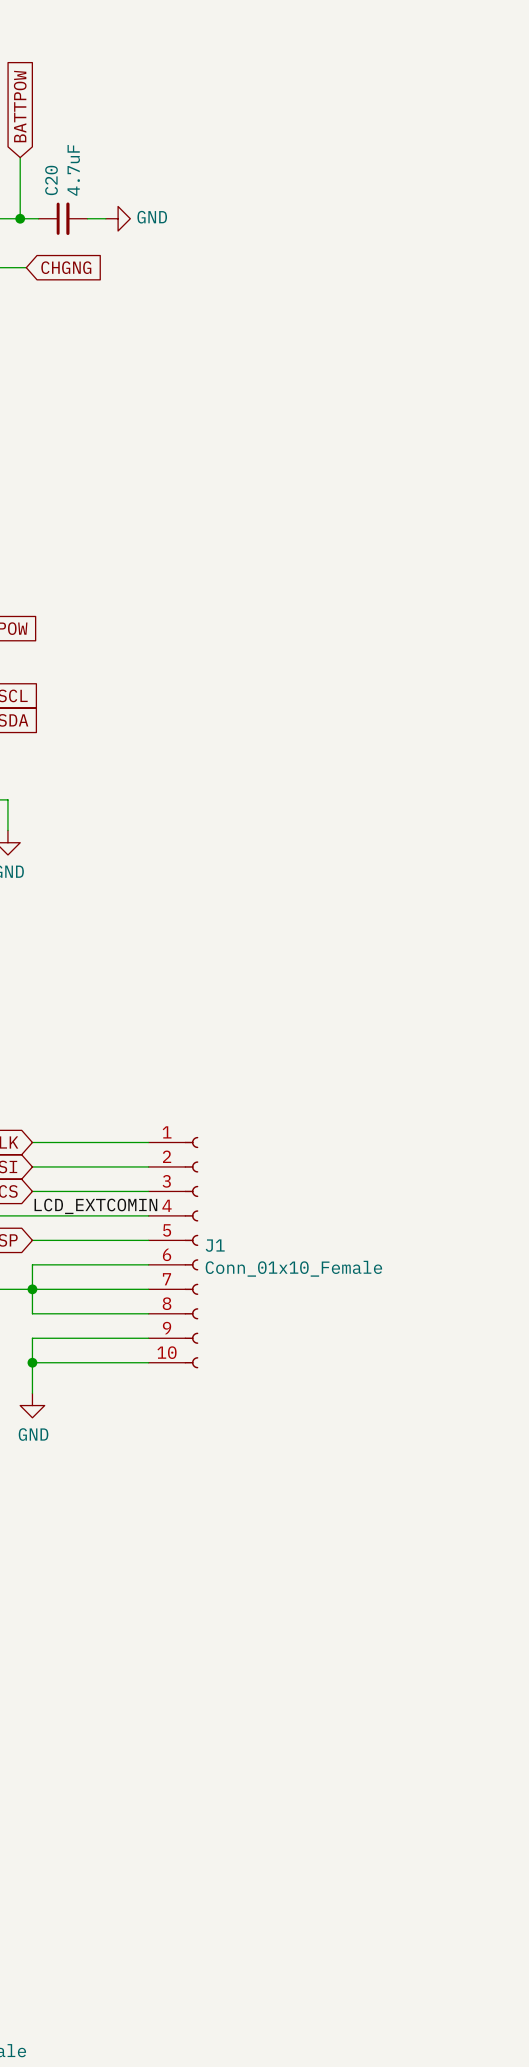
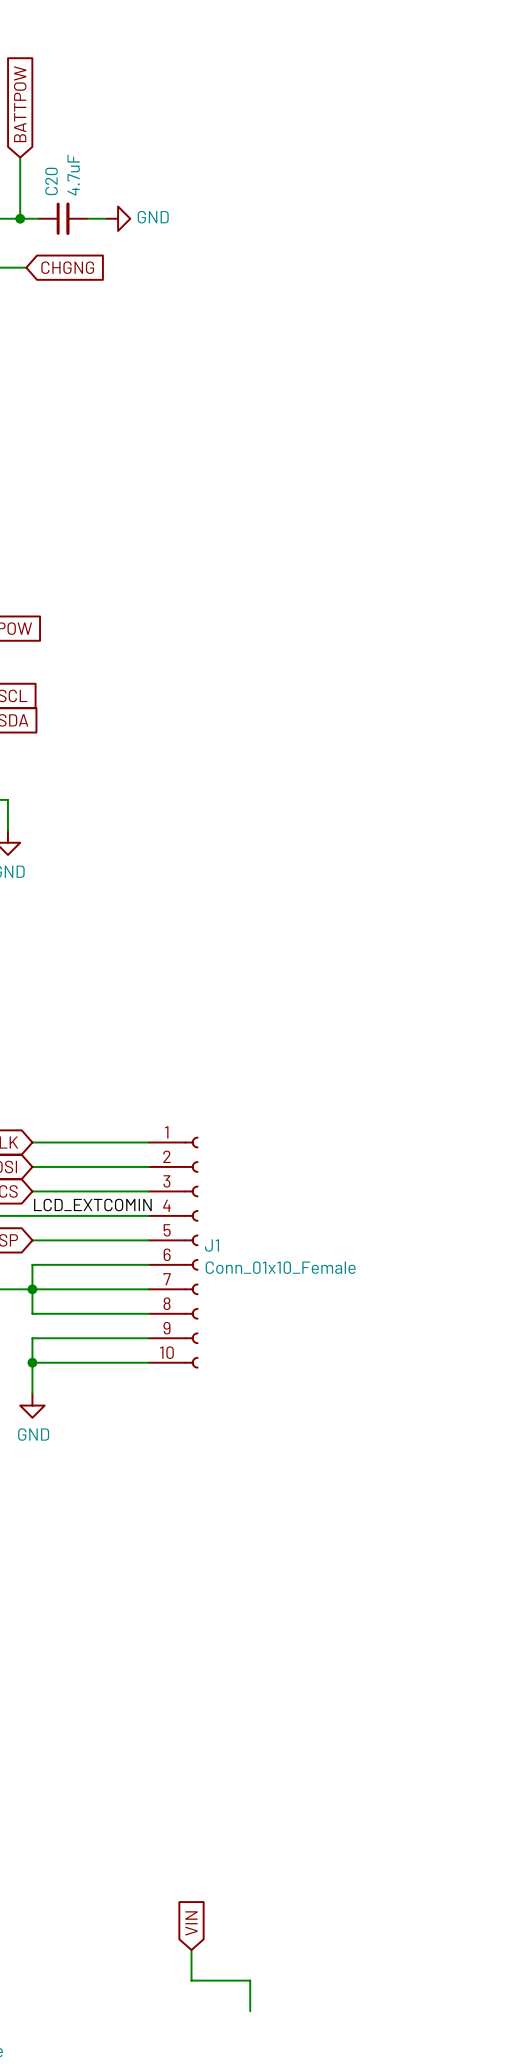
global label: none -> VIN (191, 1923)
wire: none -> (191, 1950) (191, 1980) (250, 1980) (250, 2011)

